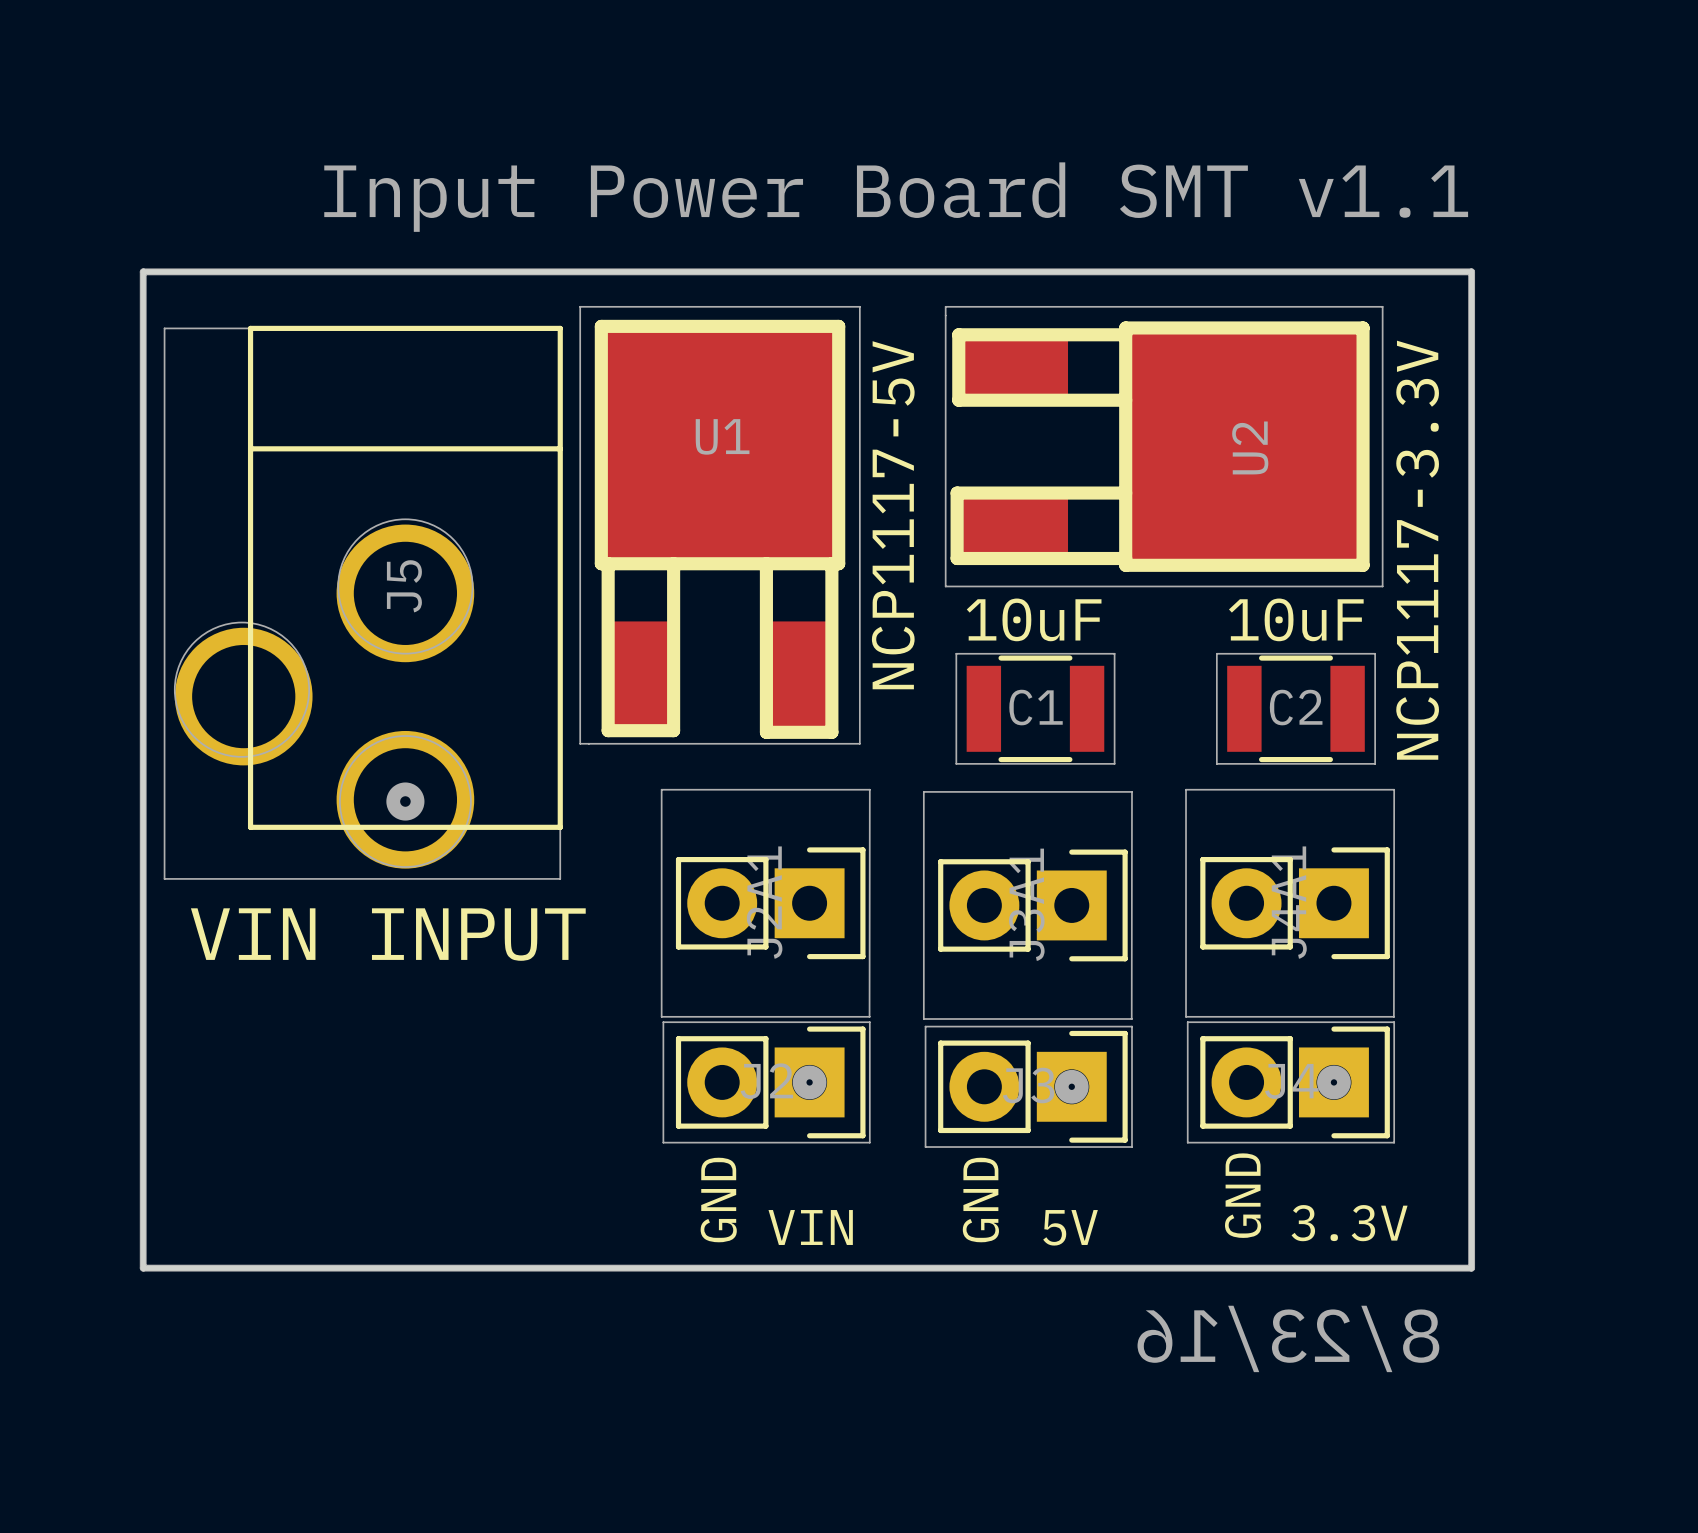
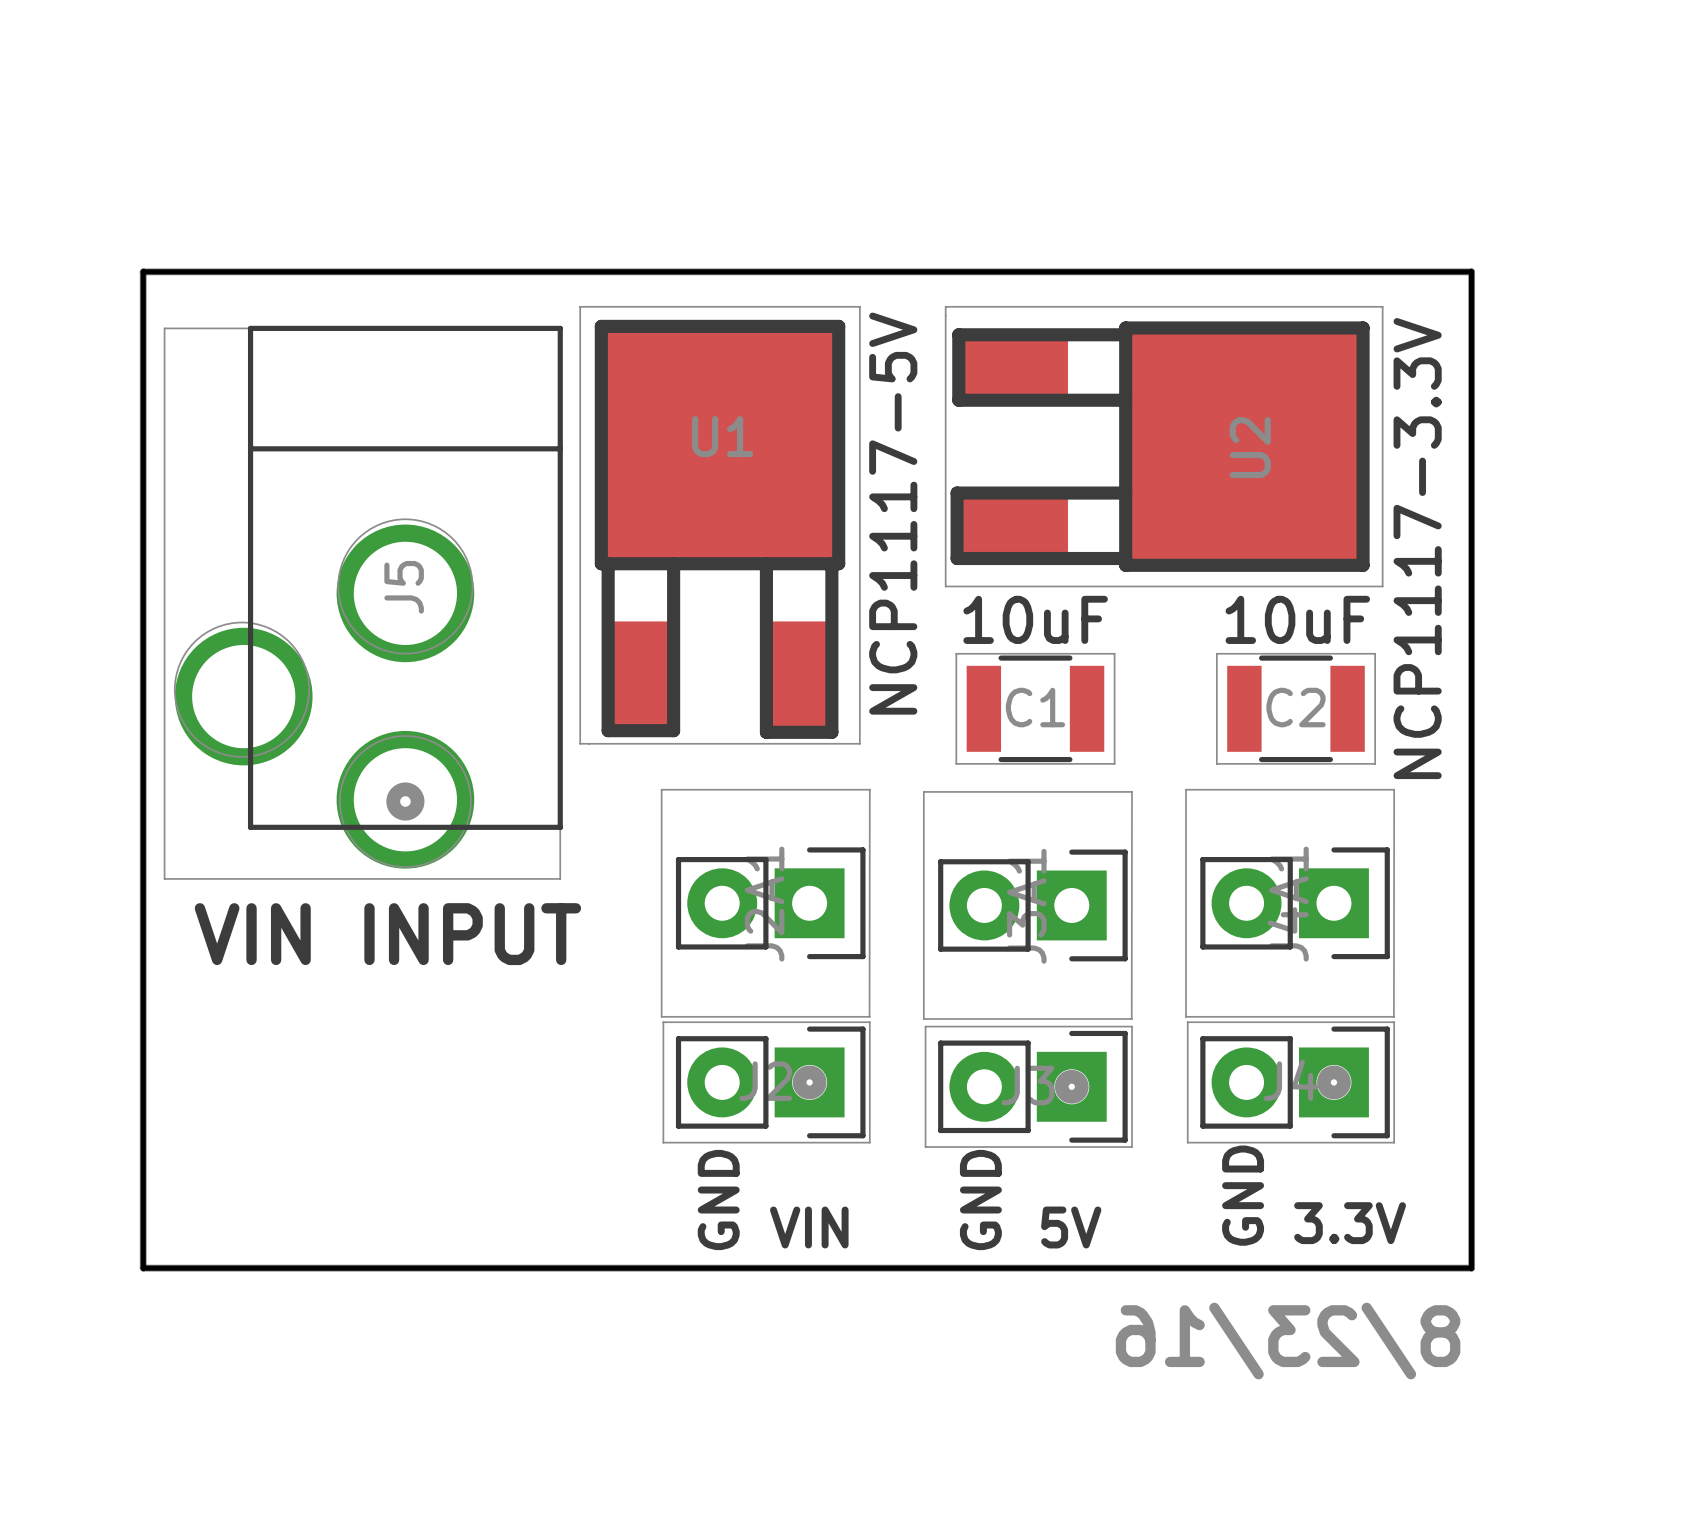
text: Input Power Board SMT v1.1 (896, 197) -> none

